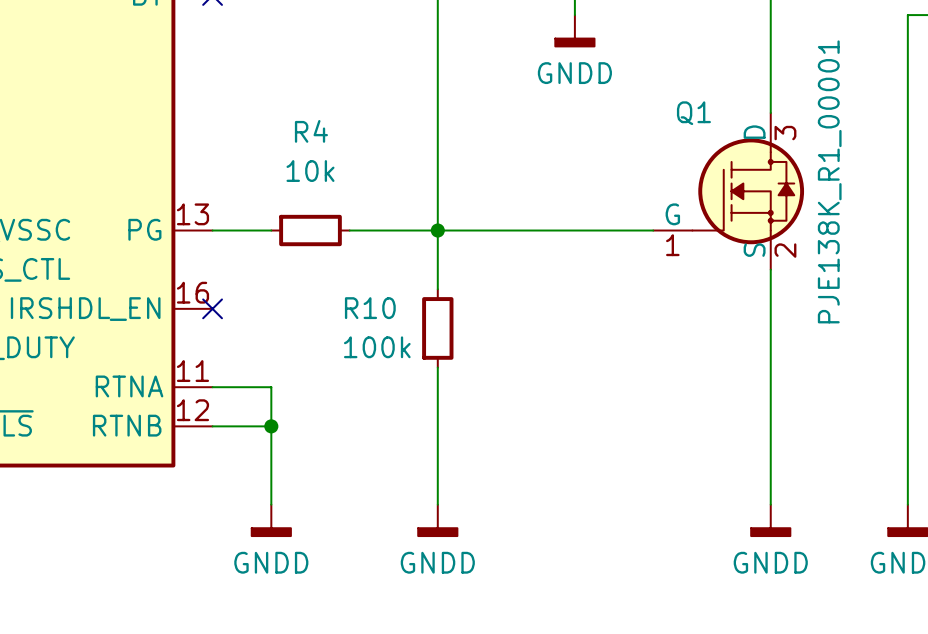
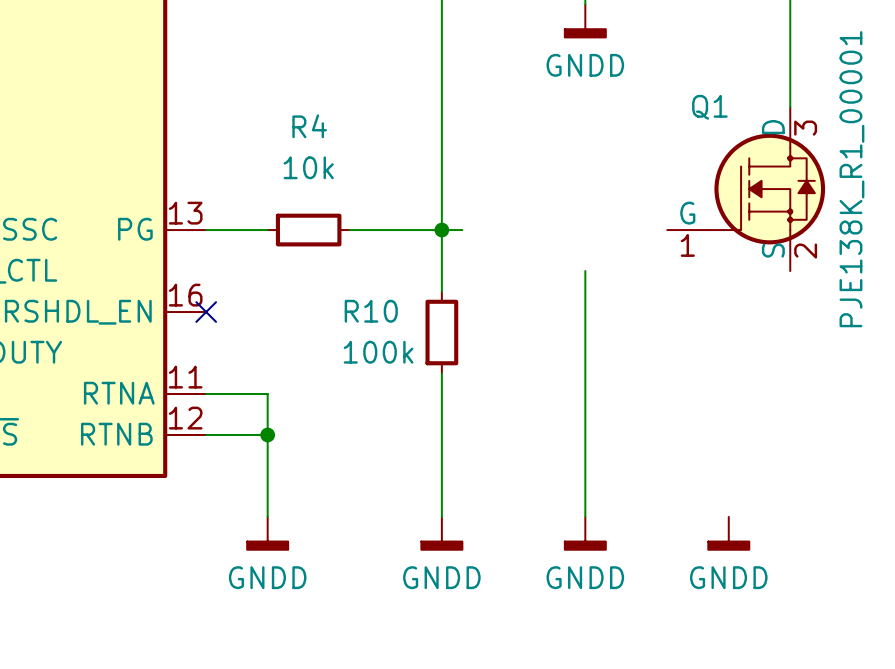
wire: (457, 230) (653, 230) -> none
wire: (770, 269) (770, 504) -> (585, 271) (585, 516)
power symbol: none -> GNDD (585, 533)
power symbol position: GNDD (770, 520) -> GNDD (728, 533)

